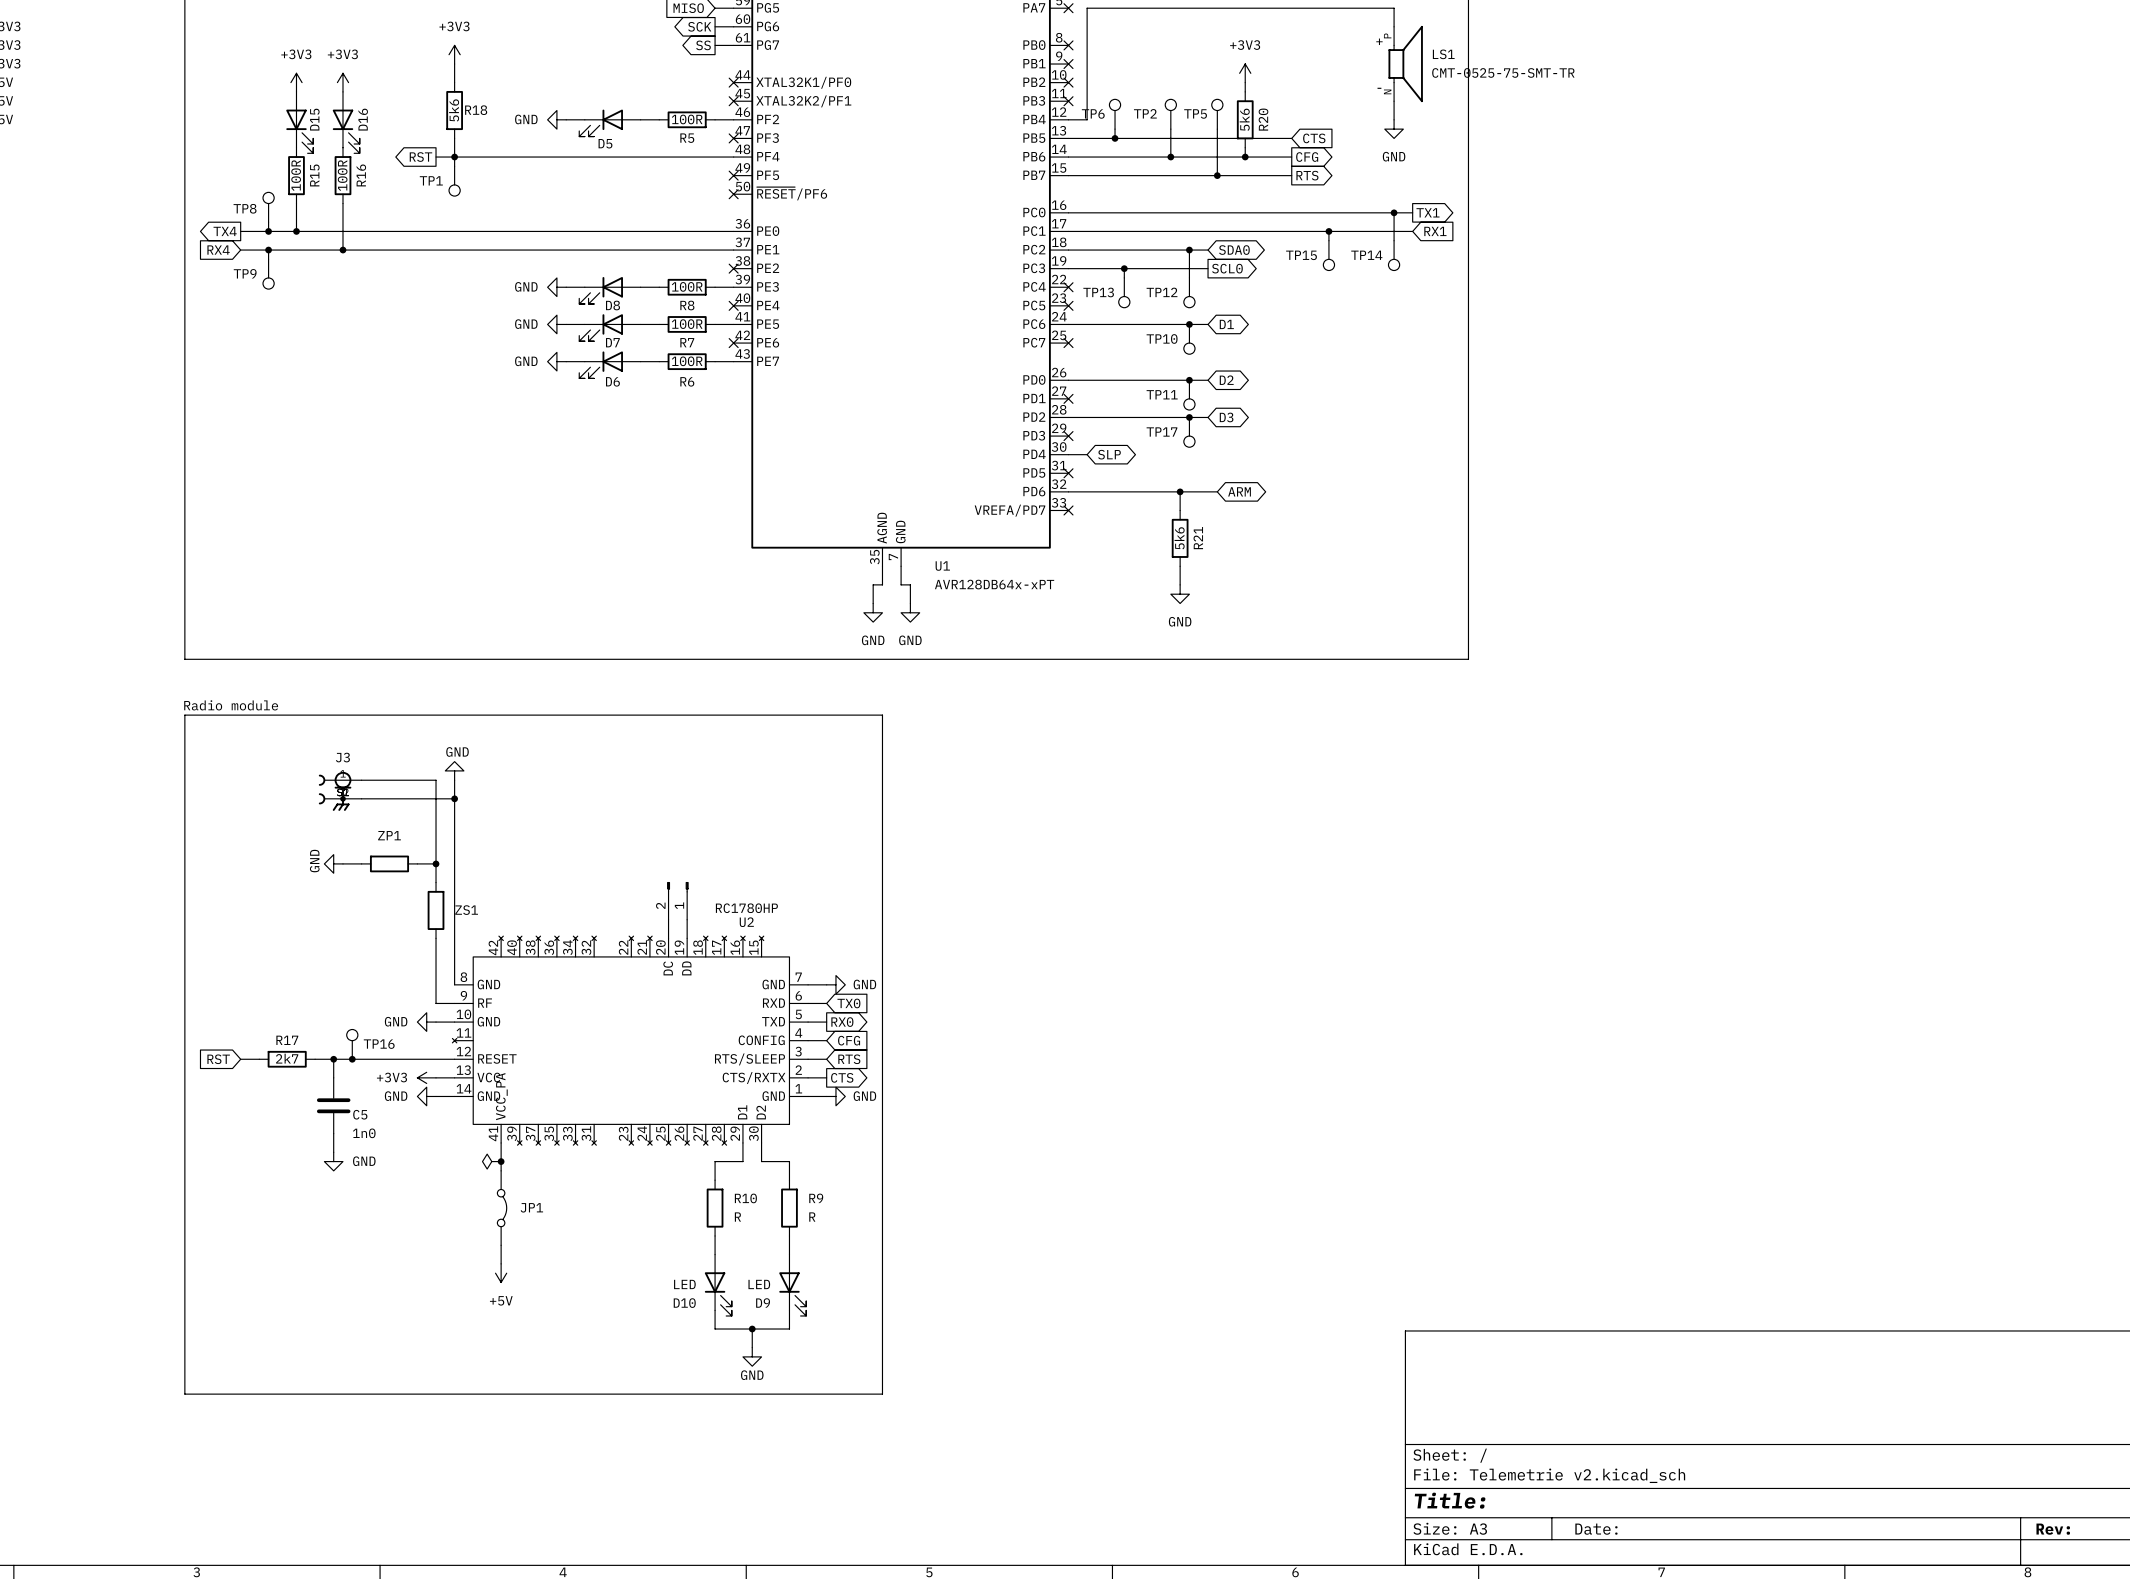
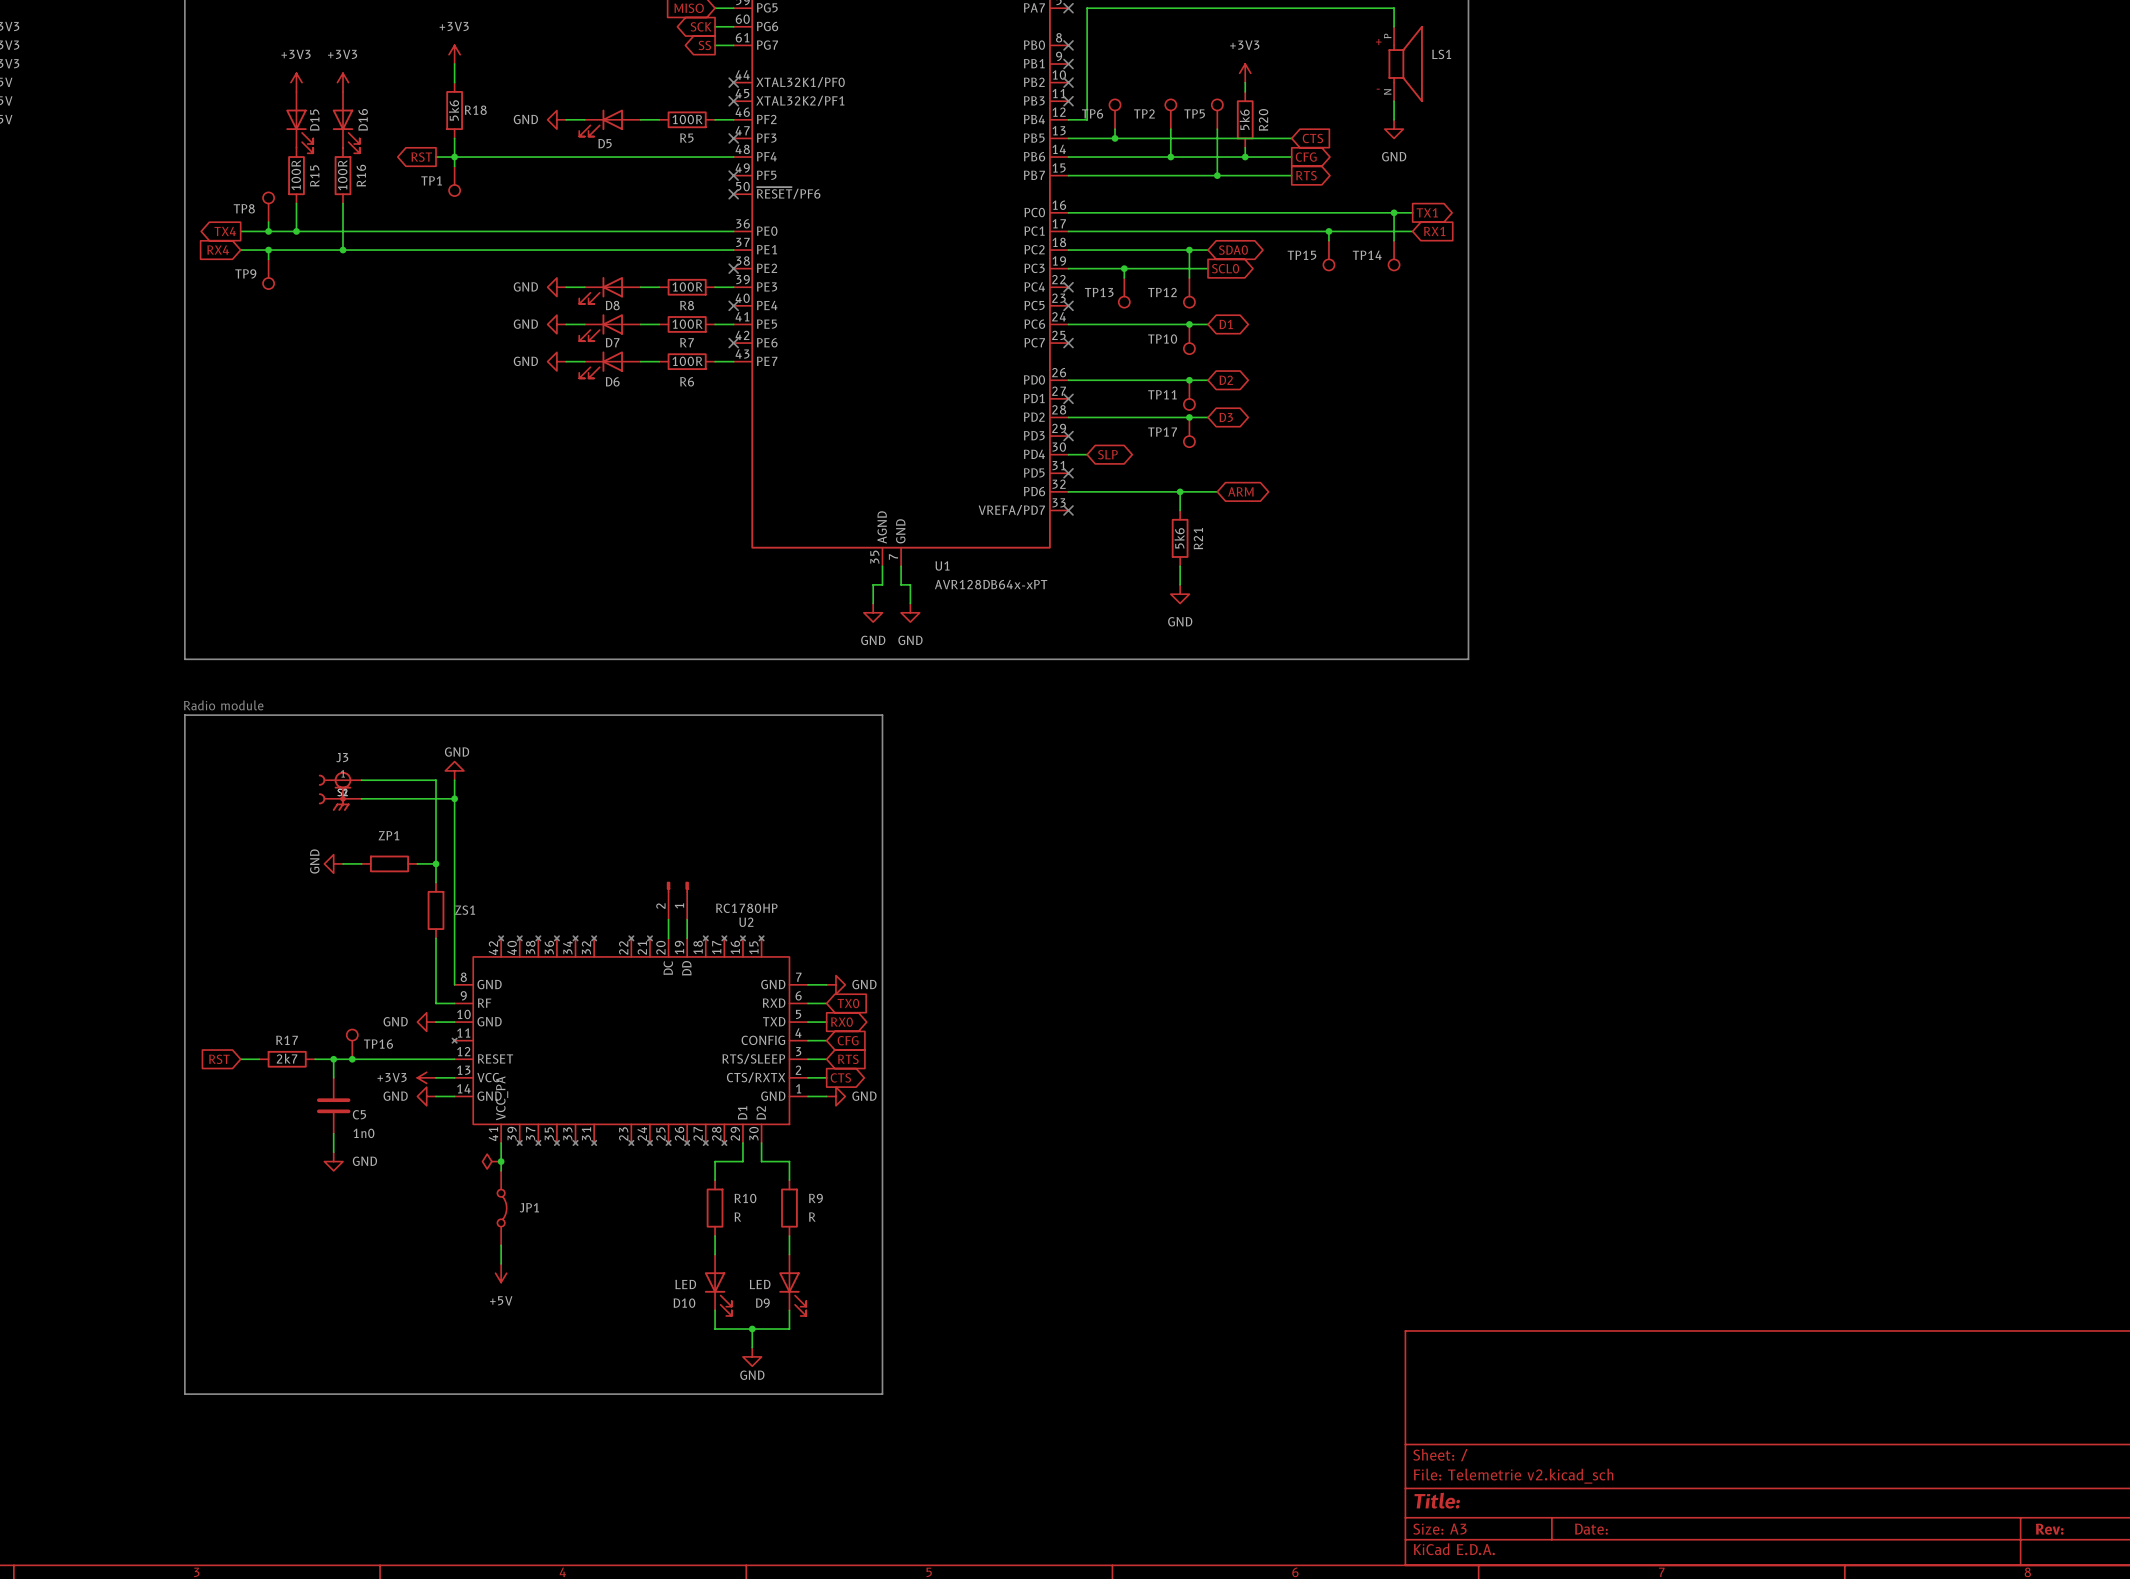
LS1 value: CMT-0525-75-SMT-TR (1503, 72) -> none

